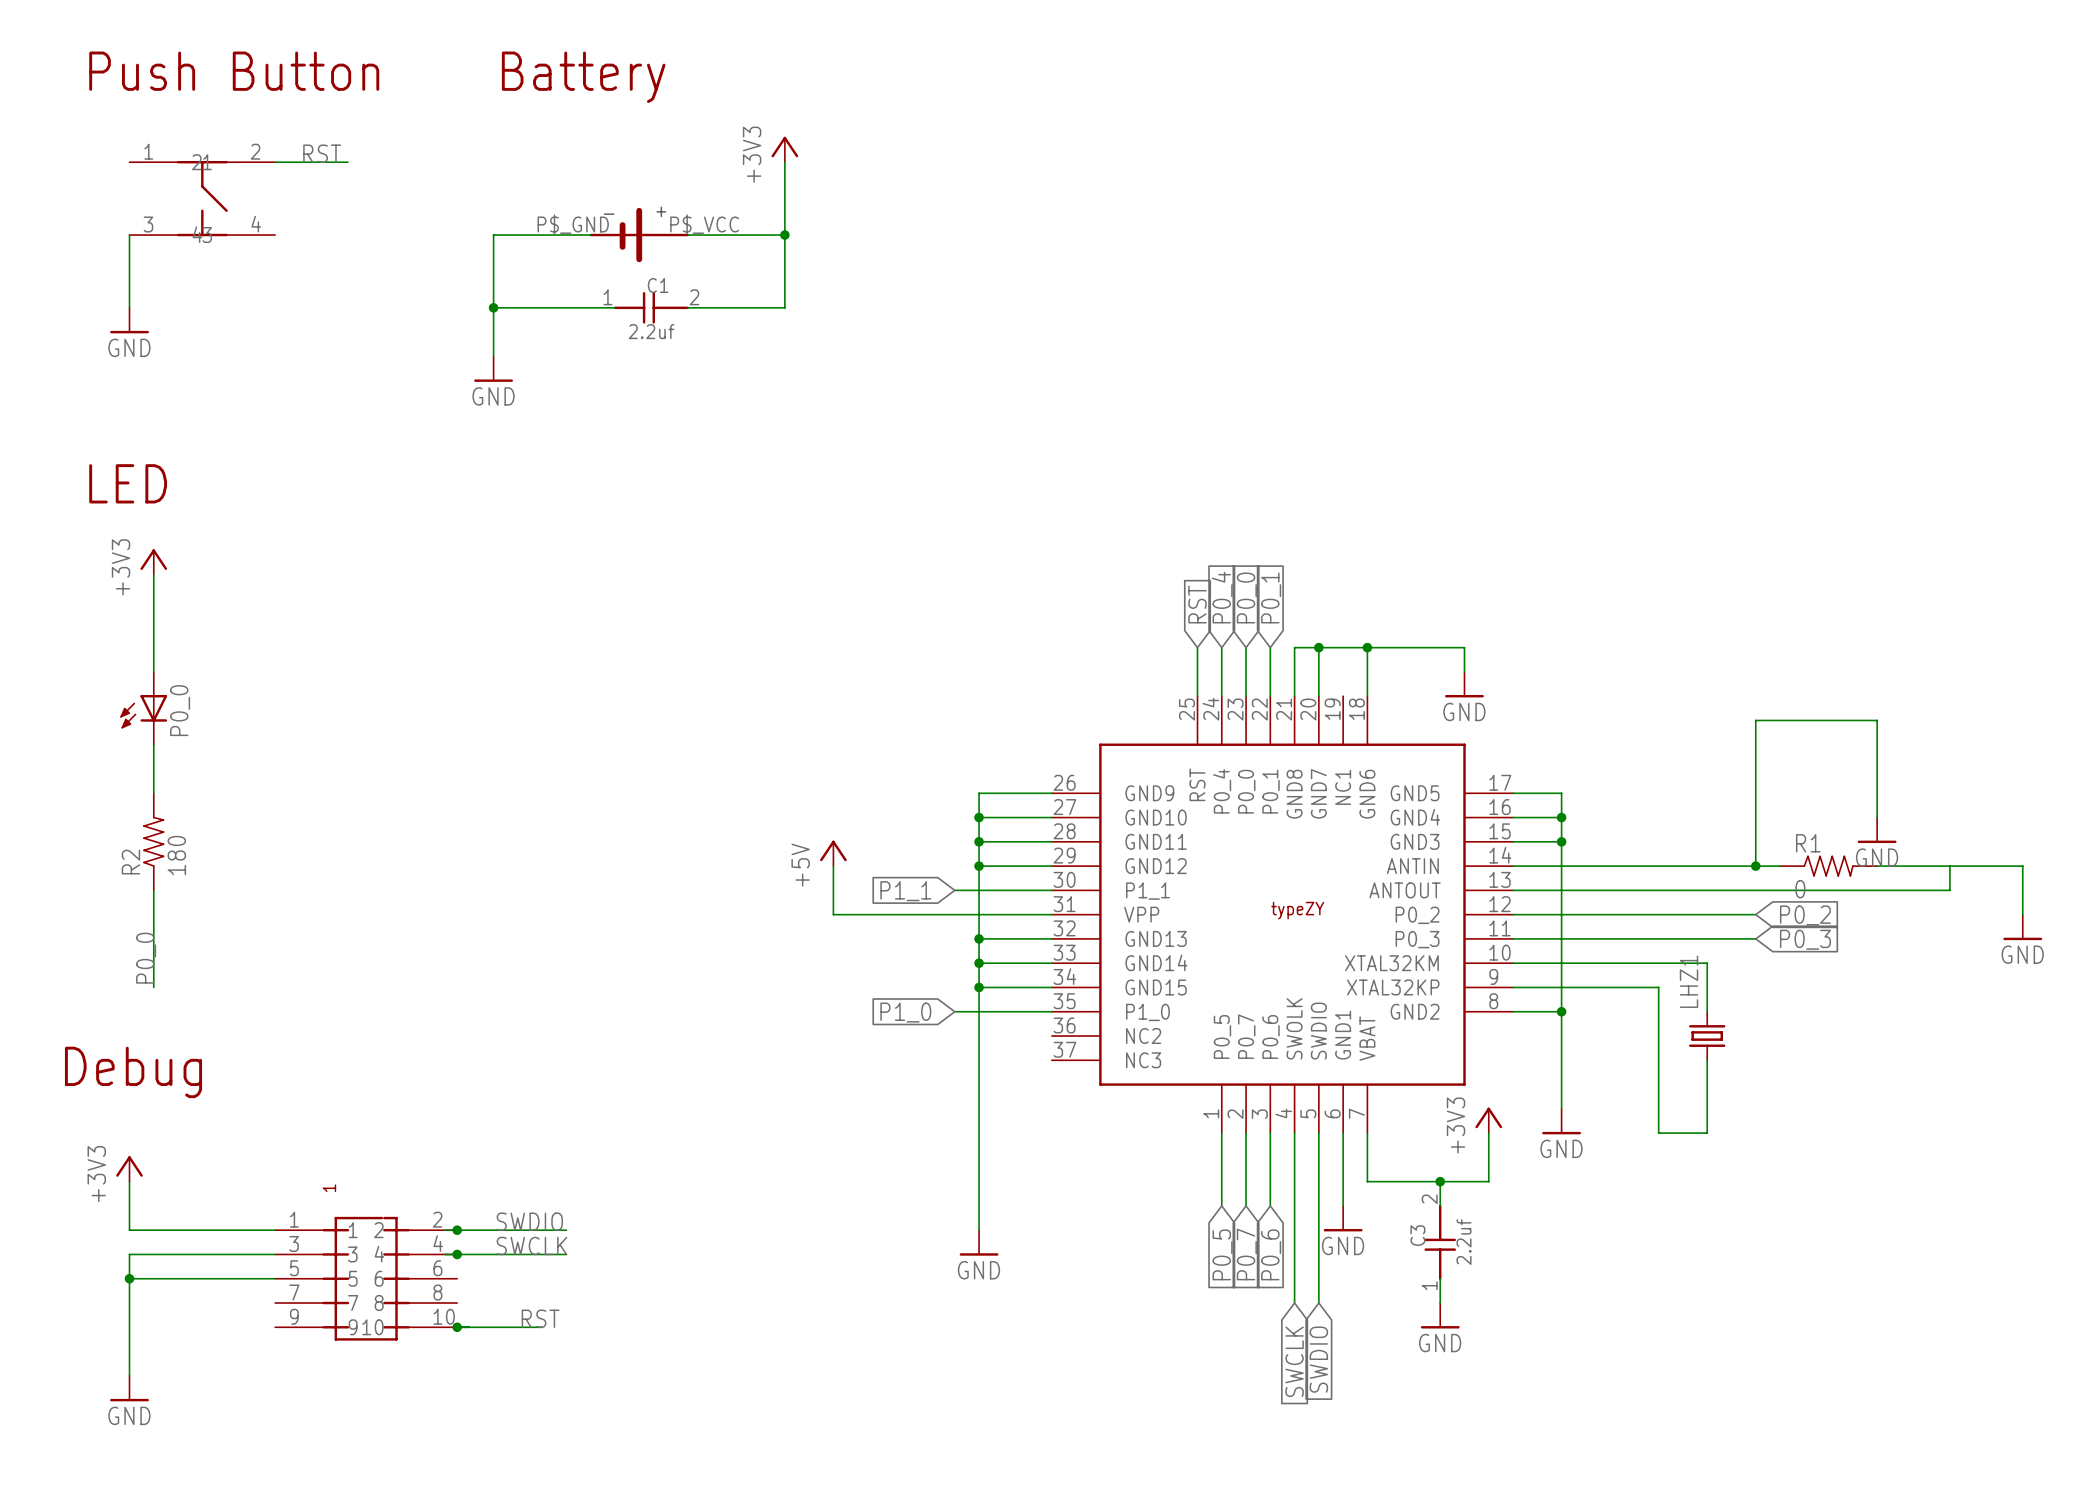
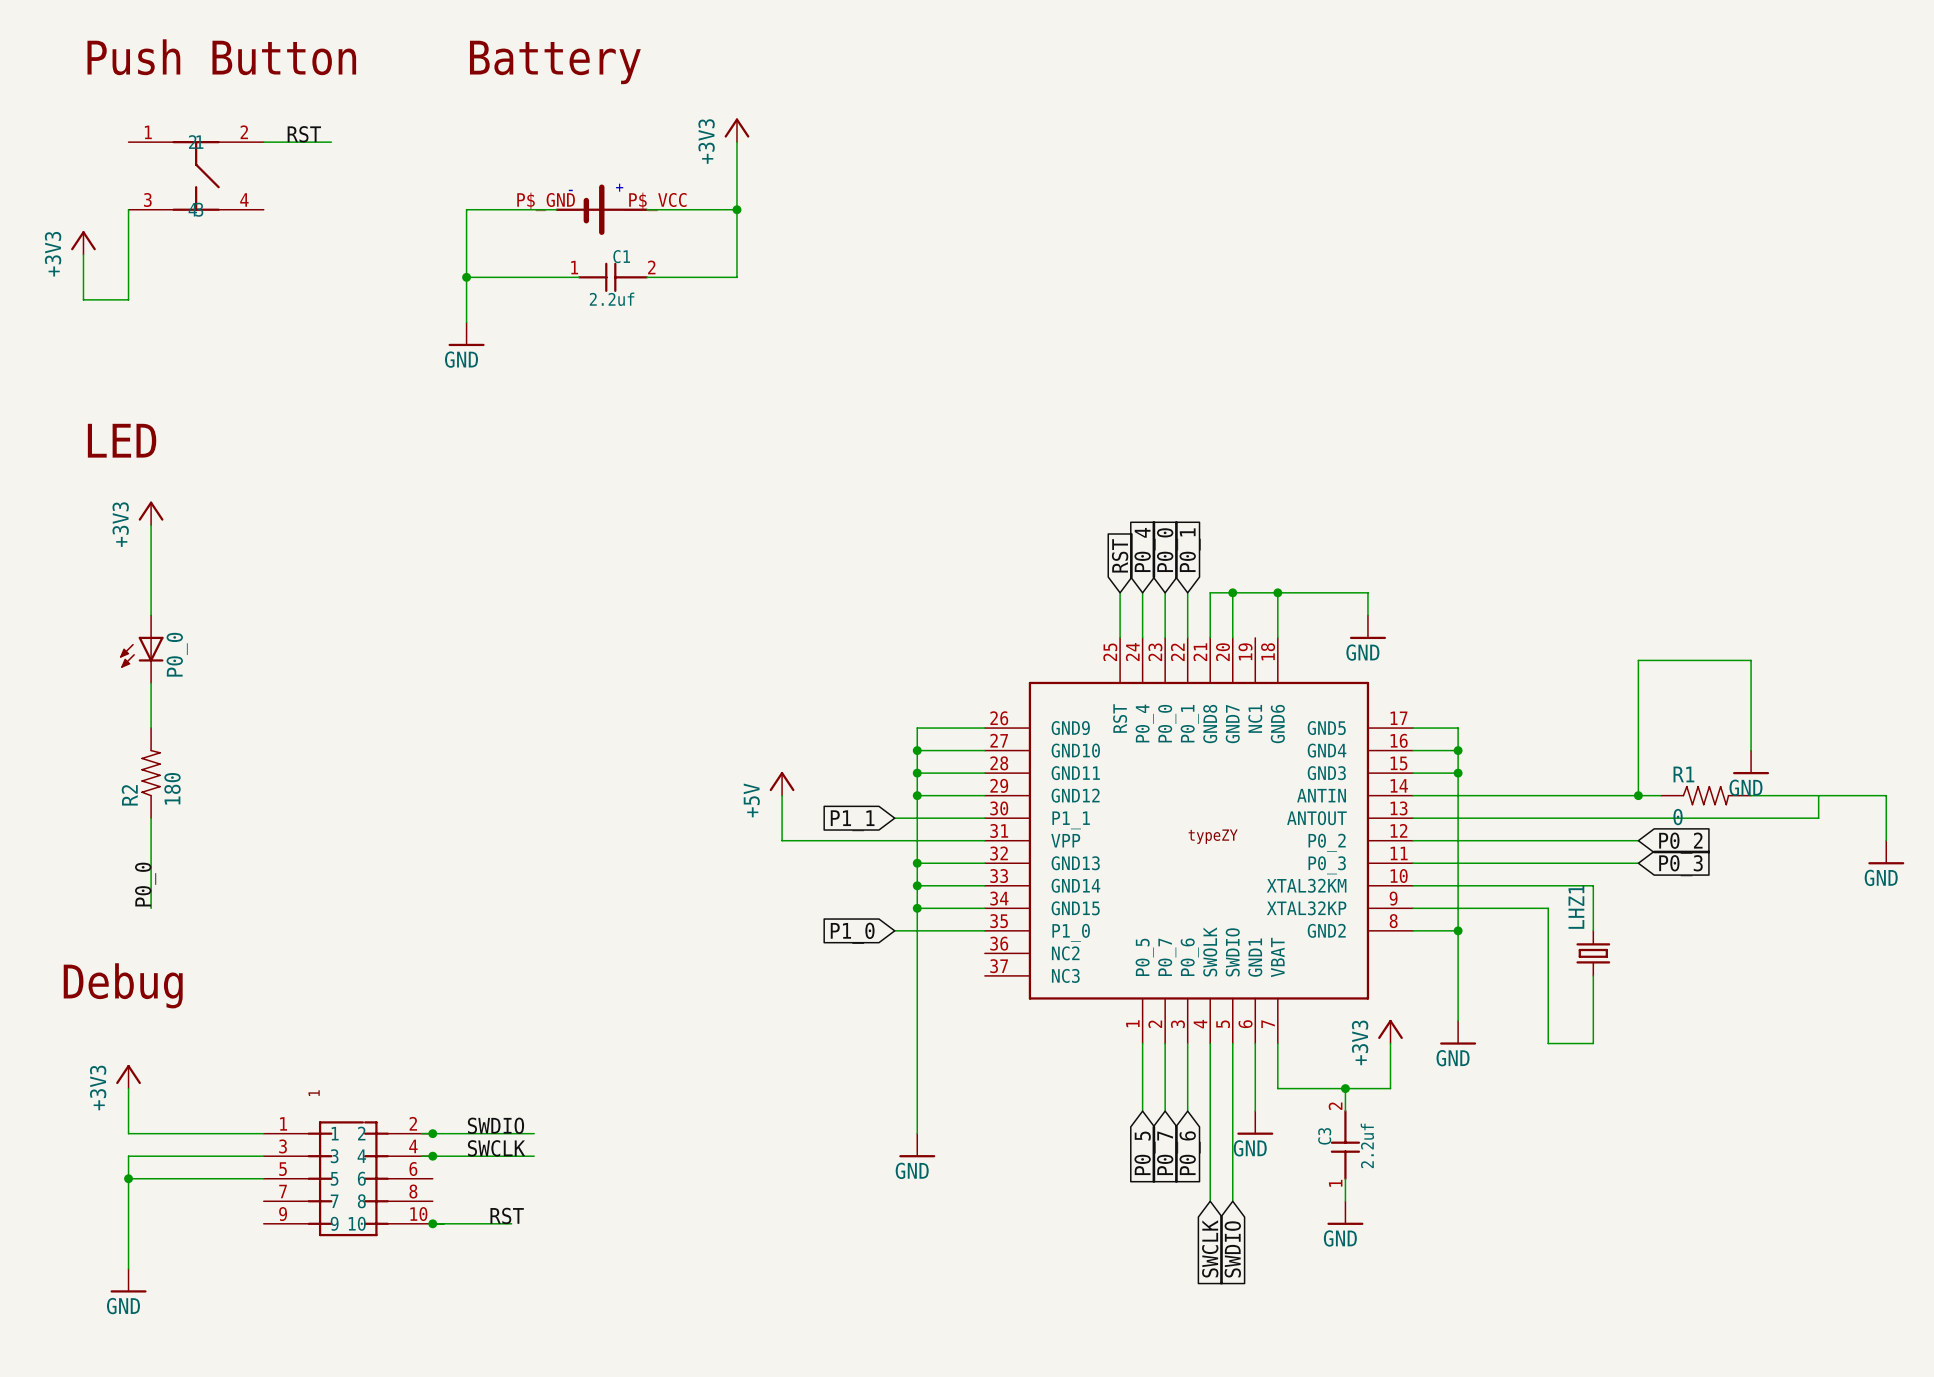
power symbol: none -> +3V3 (83, 242)
wire: none -> (83, 254) (83, 299) (128, 299) (128, 277)
power symbol: GND (129, 320) -> none

